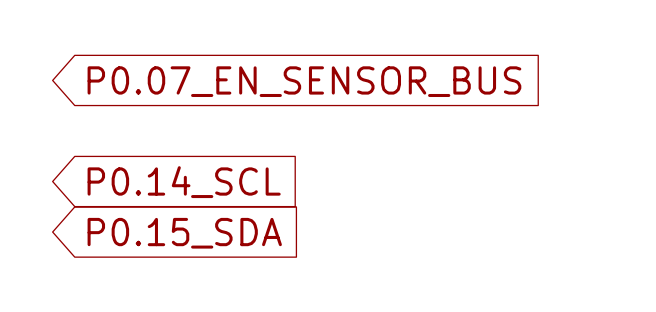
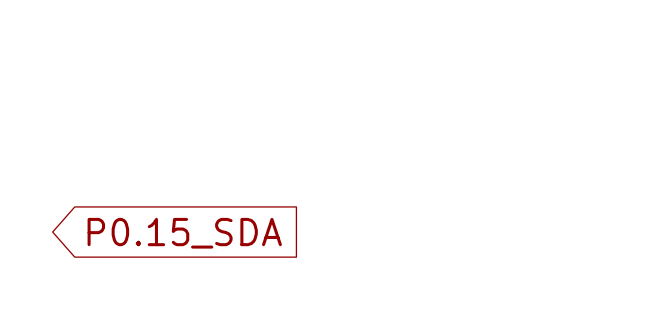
global label: P0.07_EN_SENSOR_BUS (304, 81) -> none
global label: P0.14_SCL (184, 182) -> none

